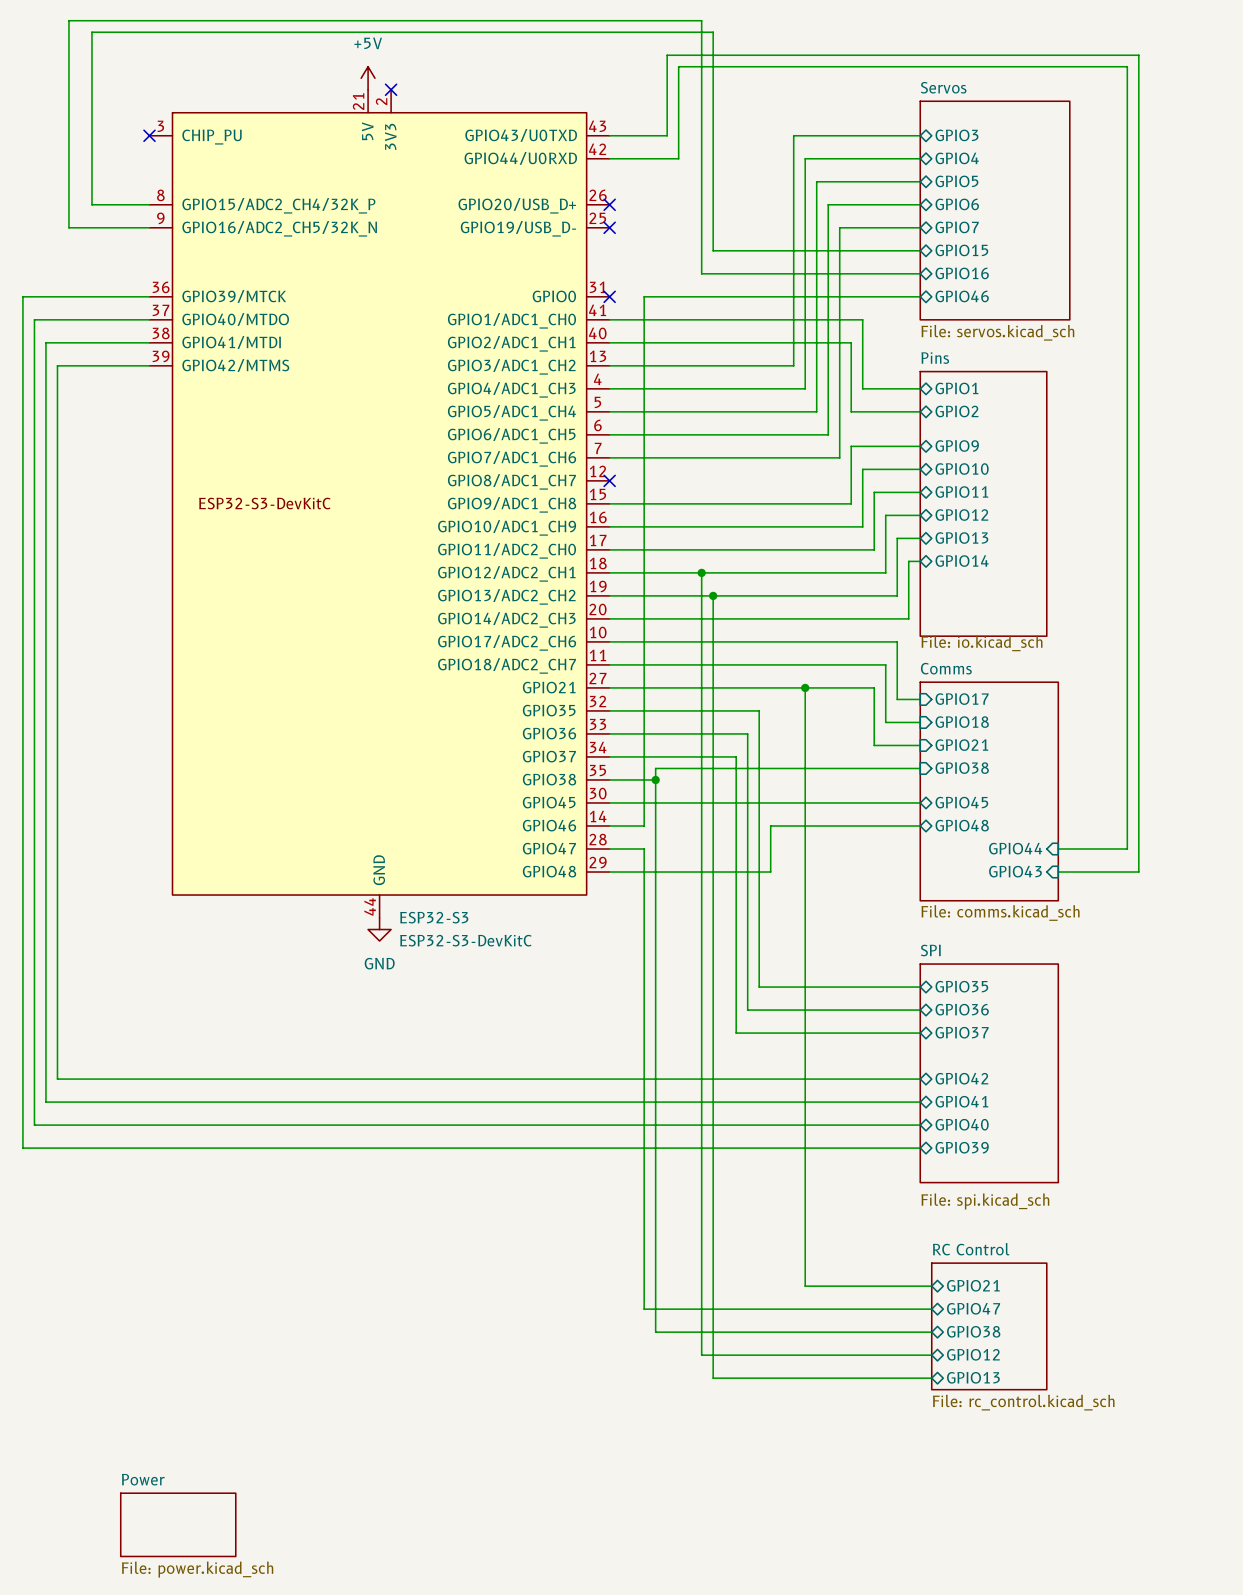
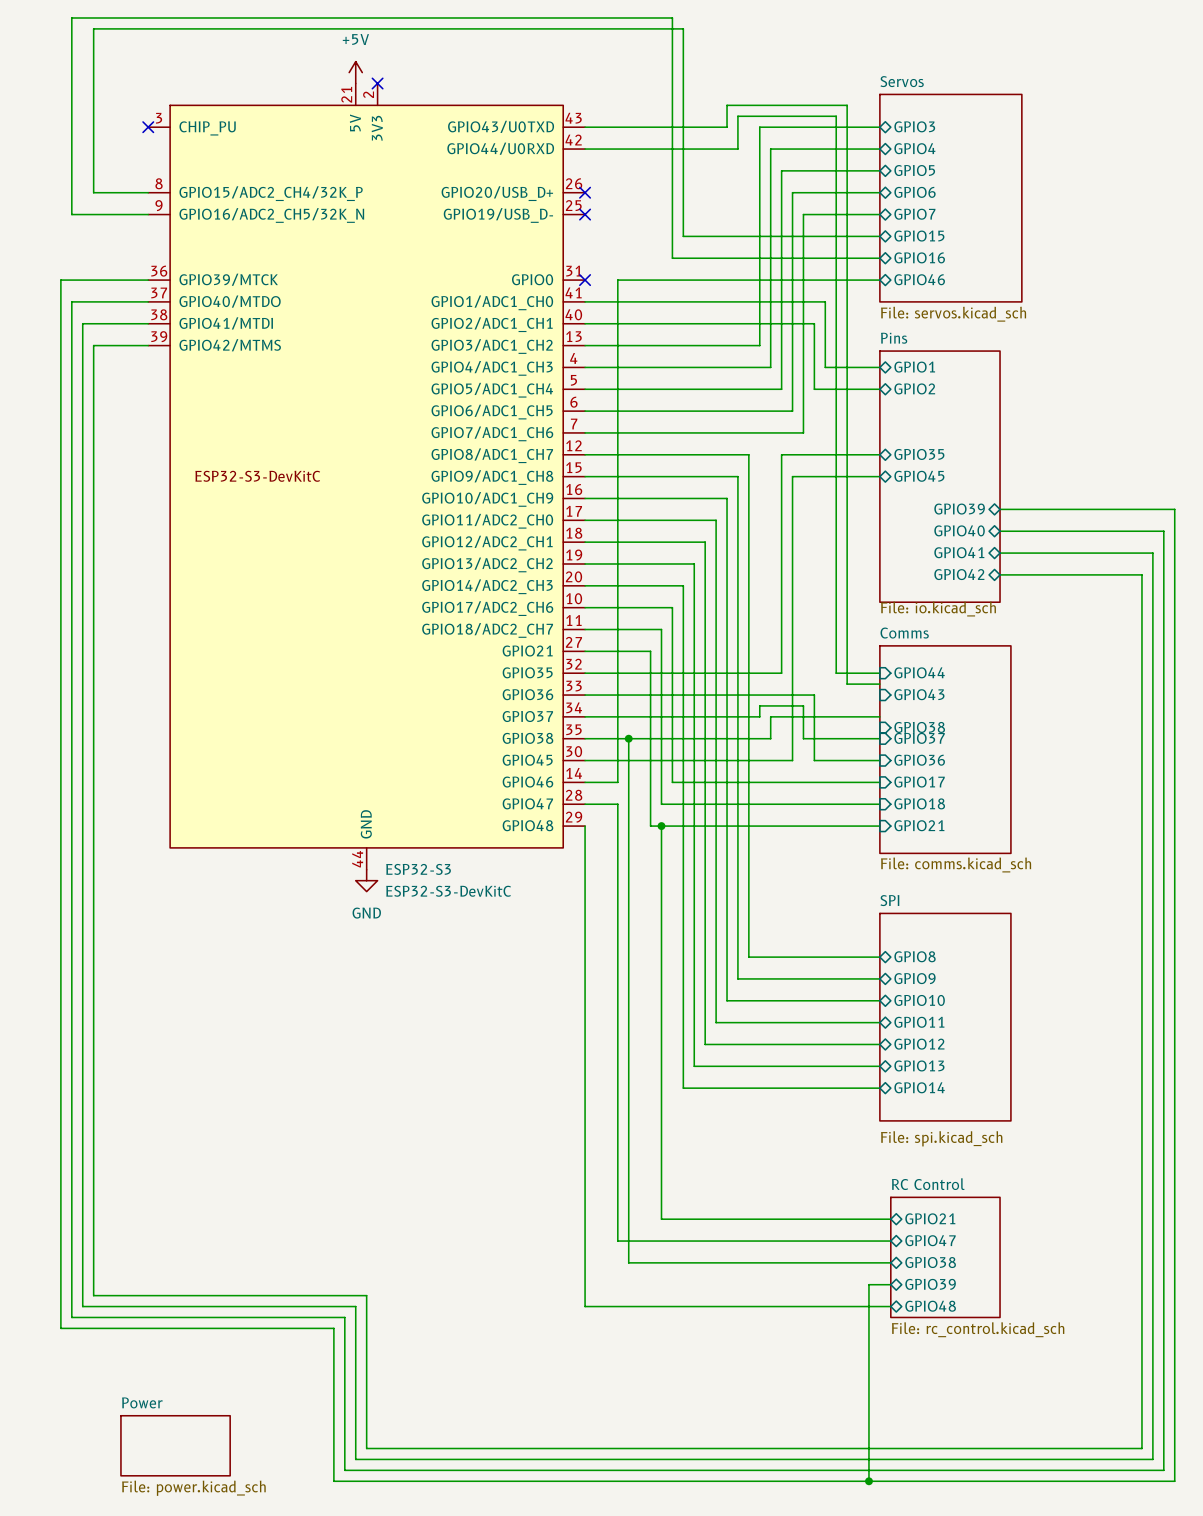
wire: (667, 135) (667, 55) (1138, 55) (1138, 872) (1058, 872) -> (639, 127) (727, 127) (727, 105) (847, 105) (847, 487)
wire: (678, 158) (678, 66) (1127, 66) (1127, 849) (1058, 849) -> (650, 149) (737, 149) (737, 116) (836, 116) (836, 465)
wire: (57, 296) (22, 296) (22, 1148) (713, 1148) (713, 1378) -> (585, 826) (585, 1306) (683, 1306)
wire: (68, 319) (34, 319) (34, 1125) (724, 1125) -> (71, 301) (71, 1317) (344, 1317) (344, 1470) (1163, 1470) (1163, 531) (1000, 531)
wire: (80, 342) (45, 342) (45, 1102) (736, 1102) -> (82, 323) (82, 1306) (355, 1306) (355, 1459) (1152, 1459) (1152, 553) (1000, 553)
wire: (57, 365) (91, 365) -> (60, 345) (60, 280)
wire: none -> (93, 345) (93, 1295) (366, 1295) (366, 1448) (1141, 1448) (1141, 574) (1000, 574)
wire: (920, 446) (851, 446) (851, 503) -> (879, 476) (814, 476)
sheet pin: GPIO9 (957, 446) -> none
wire: (920, 469) (862, 469) (862, 526) (759, 526) -> (879, 454) (781, 454) (781, 673) (727, 673) (727, 498)
sheet pin: GPIO10 (962, 469) -> none
wire: none -> (585, 454) (748, 454) (748, 957)
no-connect mark: (609, 480) -> none
sheet pin: none -> GPIO35 (919, 454)
wire: (874, 492) (920, 492) -> none
sheet pin: GPIO11 (961, 492) -> none
wire: (770, 503) (828, 503) -> (792, 760) (792, 476)
wire: none -> (737, 476) (737, 782) (672, 782)
sheet pin: none -> GPIO45 (919, 476)
wire: (885, 515) (920, 515) -> none
sheet pin: GPIO12 (961, 515) -> none
wire: (920, 538) (897, 538) (897, 595) (724, 595) -> (694, 1066) (694, 563)
sheet pin: GPIO13 (961, 538) -> none
sheet pin: none -> GPIO39 (959, 509)
wire: (747, 549) (874, 549) -> (836, 651) (836, 520)
wire: (920, 561) (908, 561) (908, 618) (713, 618) (713, 595) -> none
sheet pin: GPIO14 (962, 561) -> none
sheet pin: none -> GPIO40 (959, 530)
wire: (701, 572) (701, 641) (897, 641) (897, 699) (920, 699) -> none
junction: (701, 572) -> none
wire: (736, 572) (885, 572) -> (847, 629) (847, 542)
wire: none -> (705, 542) (705, 716) (759, 716) (759, 705) (803, 705) (803, 738) (879, 738)
sheet pin: none -> GPIO41 (959, 552)
junction: (713, 595) -> none
sheet pin: none -> GPIO42 (959, 574)
wire: (690, 664) (885, 664) -> (661, 629) (661, 804) (879, 804)
wire: (678, 687) (874, 687) -> none
wire: (805, 687) (805, 756) -> (879, 716) (770, 716)
junction: (805, 687) -> none
sheet pin: GPIO17 (962, 699) -> none
wire: (874, 710) (874, 745) (920, 745) -> (836, 673) (879, 673)
sheet pin position: GPIO18 (962, 722) -> GPIO18 (919, 803)
sheet pin position: GPIO21 (961, 745) -> GPIO21 (919, 825)
wire: (920, 768) (655, 768) (655, 779) -> (770, 738) (628, 738)
wire: (805, 779) (805, 1286) -> (661, 826) (661, 1219) (770, 1219)
sheet pin: none -> GPIO37 (919, 738)
wire: (828, 802) (851, 802) -> (716, 520) (716, 695) (814, 695) (814, 760)
sheet pin shape: bidirectional (961, 802) -> input (919, 760)
sheet pin: GPIO45 (961, 802) -> GPIO36 (919, 760)
wire: (701, 825) (701, 1355) (908, 1355) -> (868, 1481) (868, 1284)
sheet pin shape: bidirectional (962, 825) -> input (919, 782)
sheet pin: GPIO48 (962, 825) -> GPIO17 (919, 782)
sheet pin rotation: 0° (1015, 848) -> 180° (919, 672)
sheet pin position: GPIO44 (1015, 848) -> GPIO44 (919, 672)
sheet pin rotation: 0° (1015, 871) -> 180° (919, 694)
sheet pin position: GPIO43 (1015, 871) -> GPIO43 (919, 694)
wire: (609, 872) (678, 872) -> (650, 651) (650, 826)
junction: none -> (661, 826)
wire: none -> (879, 826) (737, 826) (737, 978)
sheet pin: GPIO35 (961, 986) -> none
wire: (759, 987) (920, 987) -> (727, 935) (727, 1000) (879, 1000)
sheet pin: GPIO36 (962, 1009) -> GPIO8 (915, 956)
wire: (747, 1010) (782, 1010) -> (716, 957) (716, 1022)
sheet pin: GPIO37 (962, 1032) -> GPIO9 (914, 978)
wire: (736, 1033) (770, 1033) -> (705, 978) (705, 1044)
sheet pin: none -> GPIO10 (919, 1000)
sheet pin: GPIO42 (961, 1078) -> GPIO11 (919, 1022)
wire: (57, 1079) (747, 1079) -> (60, 1022) (60, 1328) (333, 1328) (333, 1481) (1174, 1481) (1174, 509) (1000, 509)
sheet pin: GPIO41 (961, 1101) -> GPIO12 (919, 1044)
sheet pin: GPIO40 (962, 1124) -> GPIO13 (919, 1065)
sheet pin: GPIO39 (962, 1147) -> GPIO14 (919, 1087)
sheet pin: GPIO12 (973, 1354) -> GPIO39 (930, 1284)
sheet pin: GPIO13 (973, 1377) -> GPIO48 (930, 1306)
junction: none -> (868, 1481)

